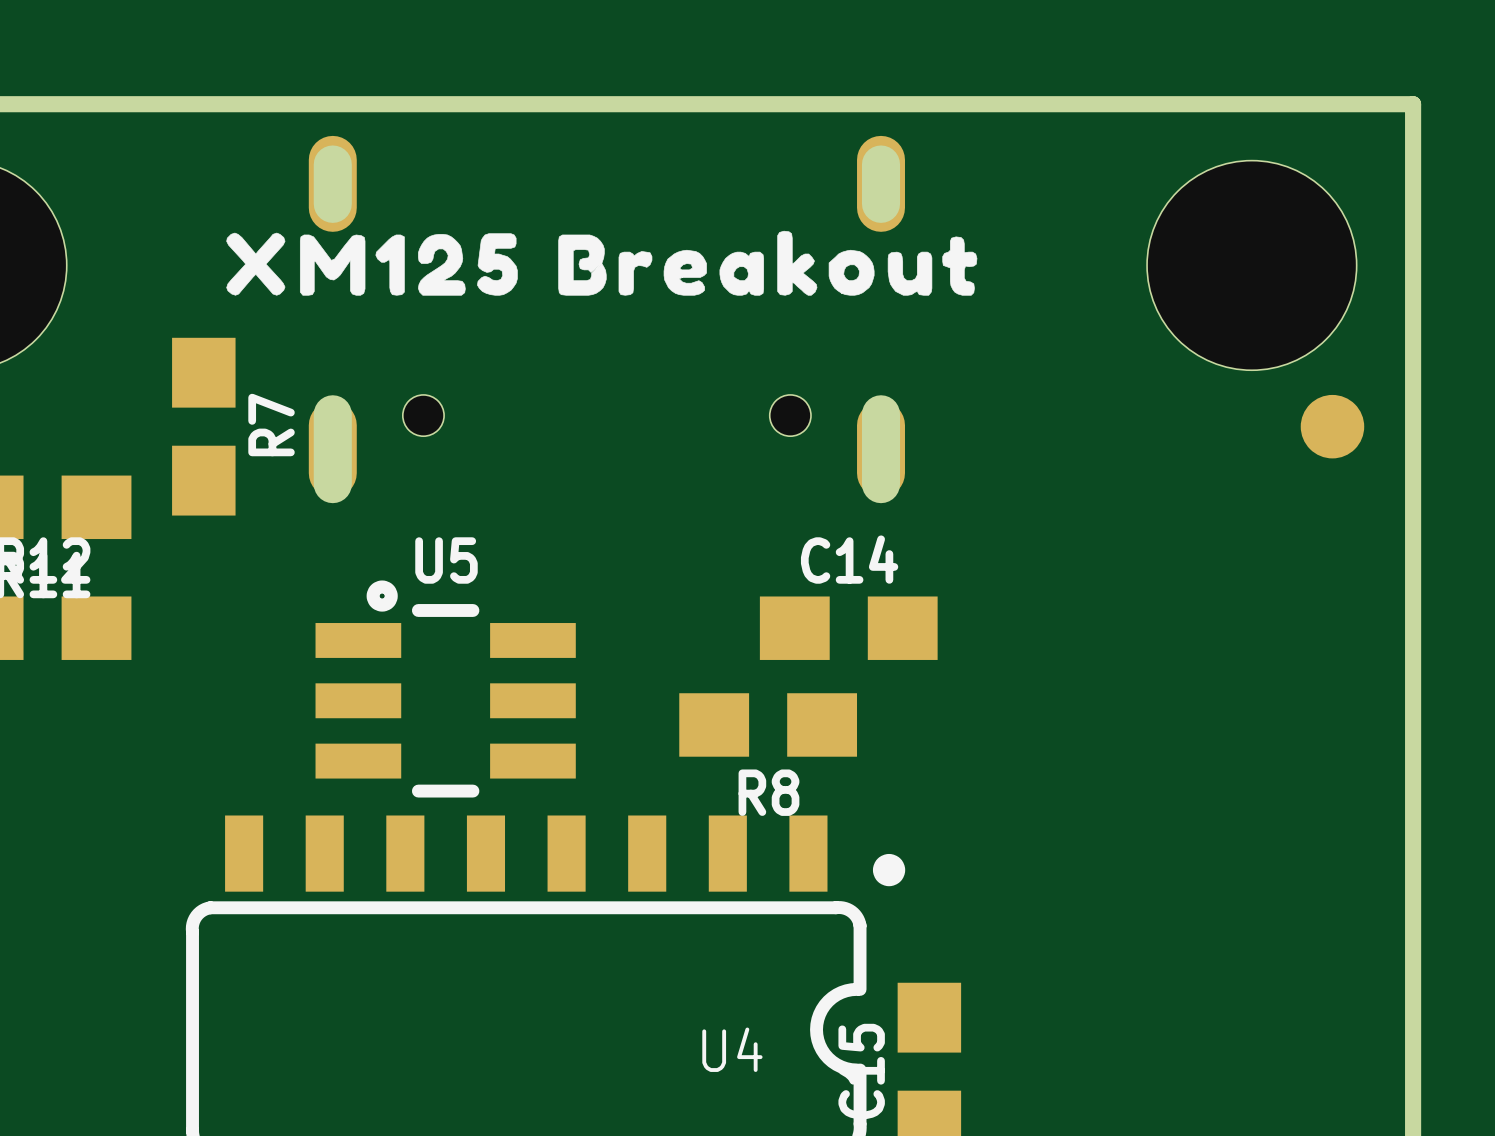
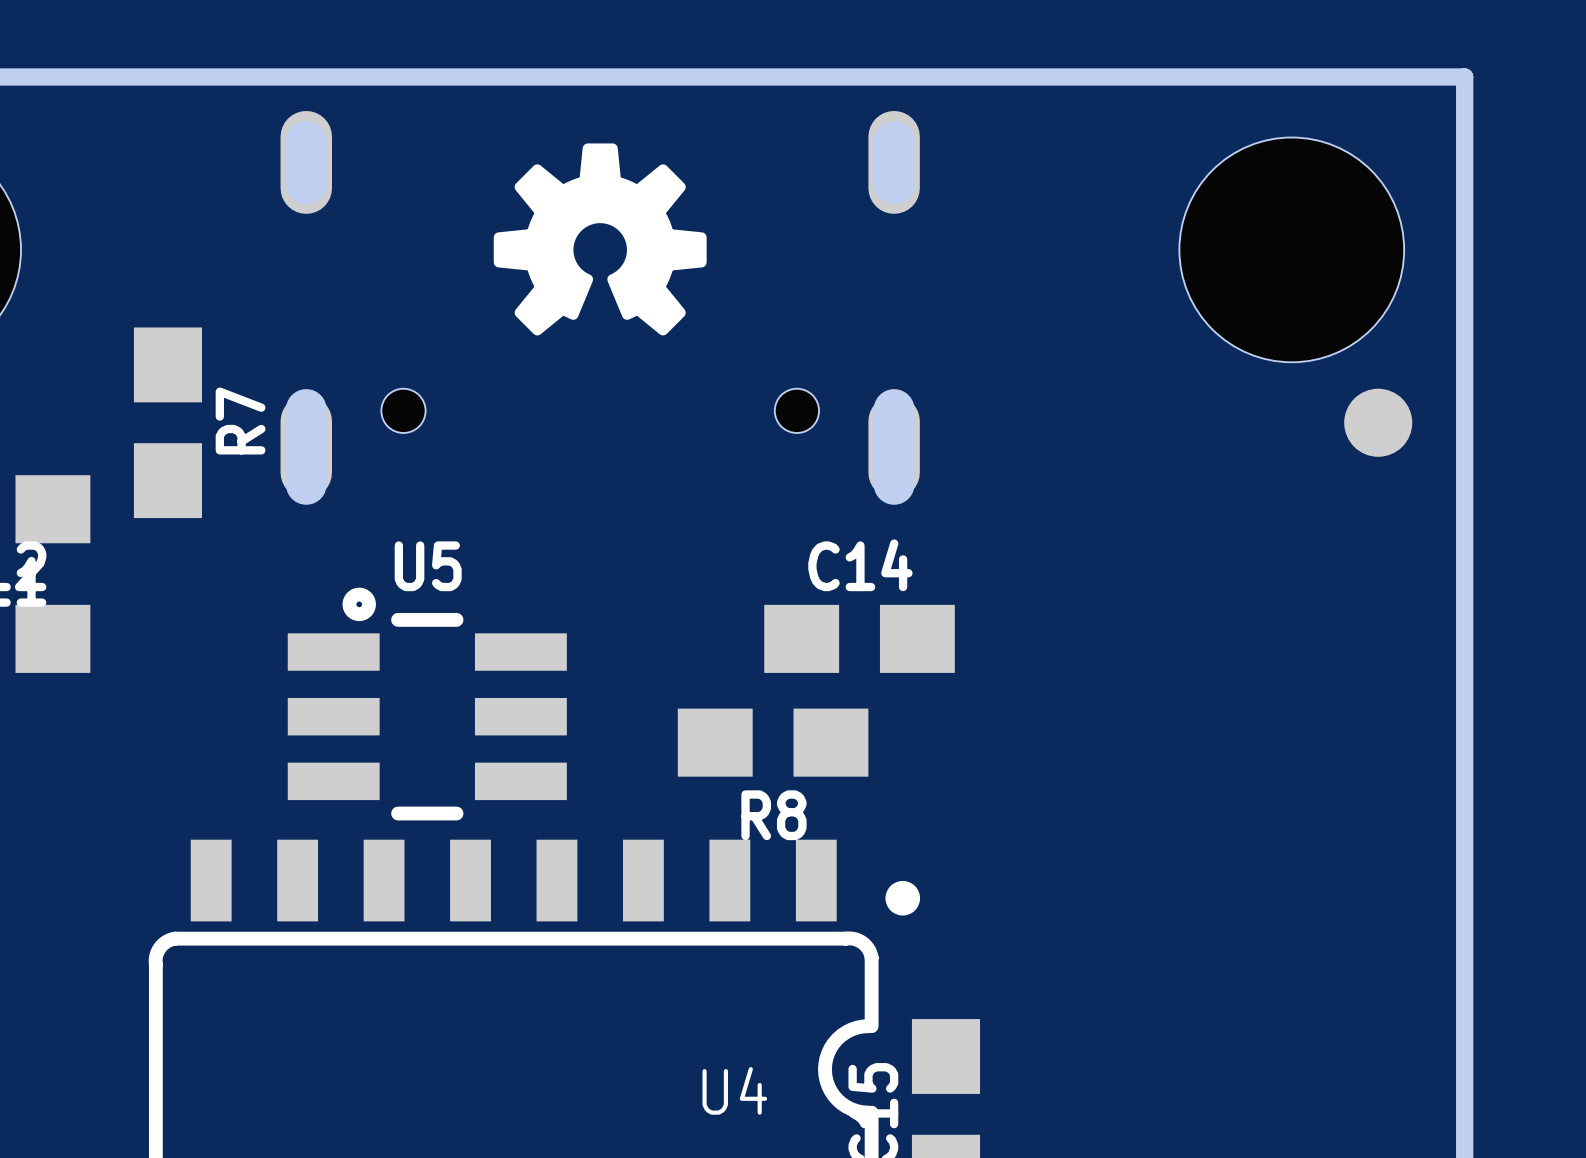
drawing shape: [226, 230, 978, 296] -> [493, 143, 707, 336]

